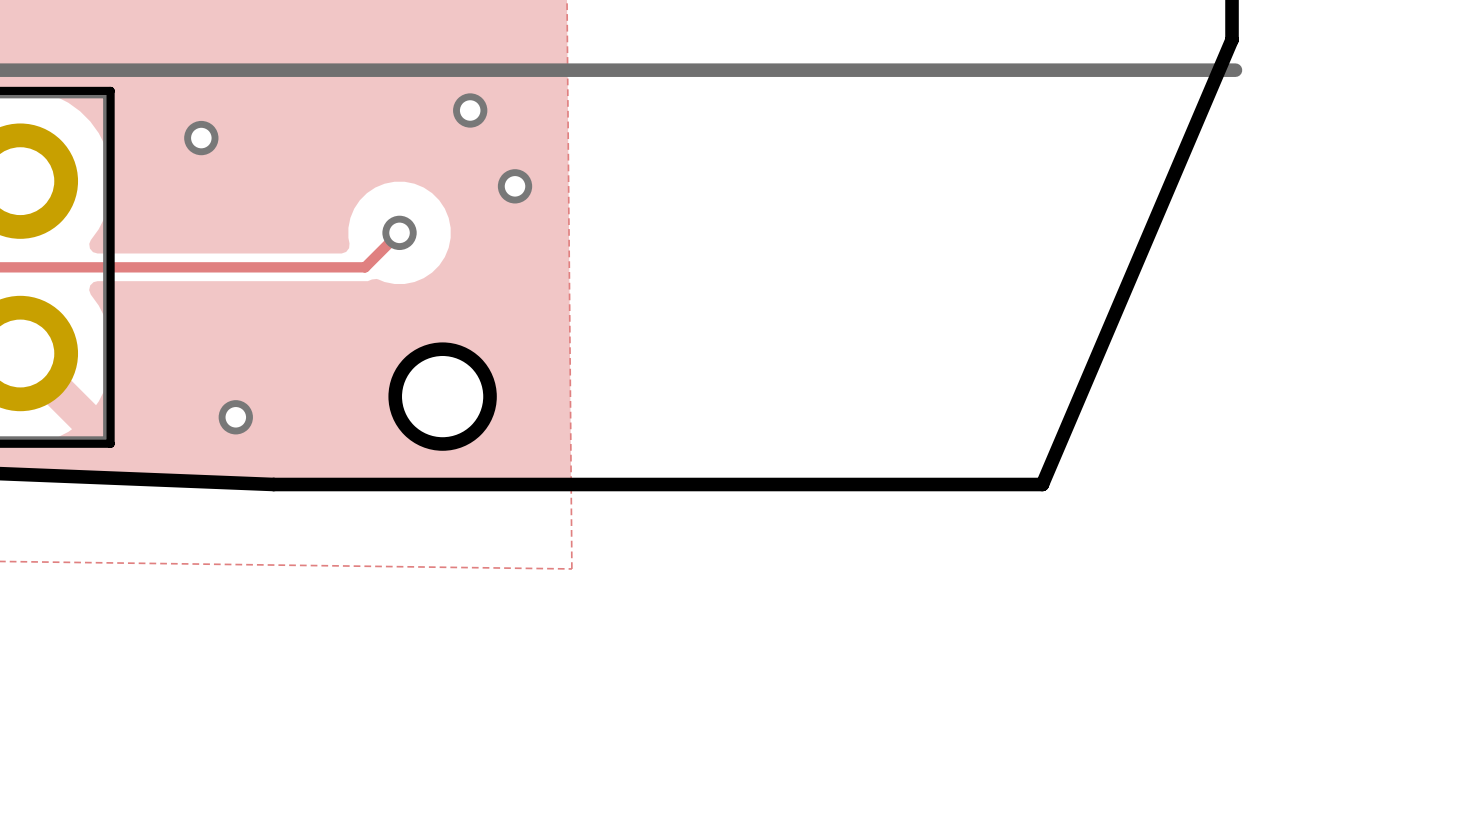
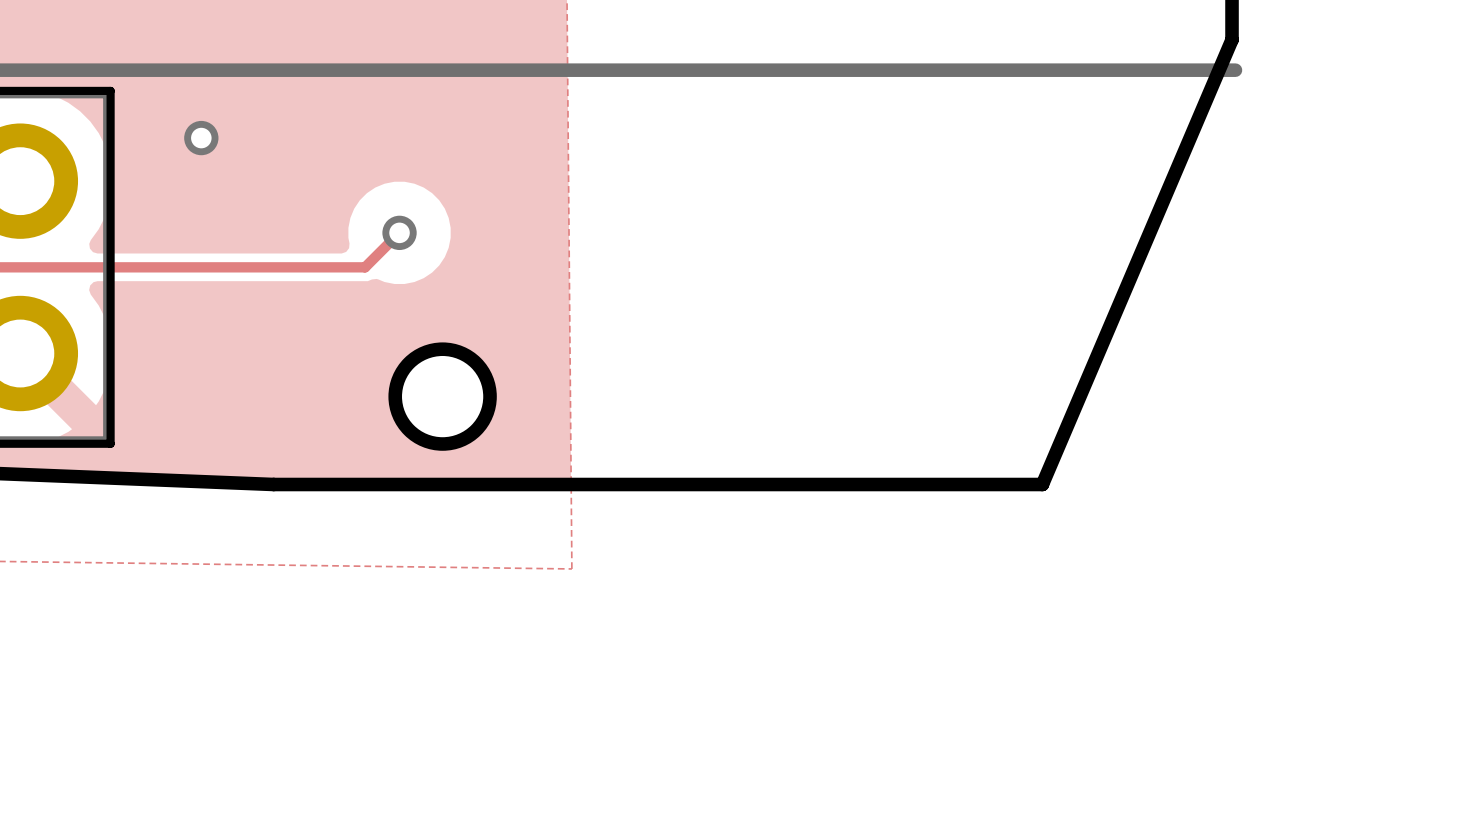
via: (470, 110) -> none
via: (515, 186) -> none
via: (235, 417) -> none

